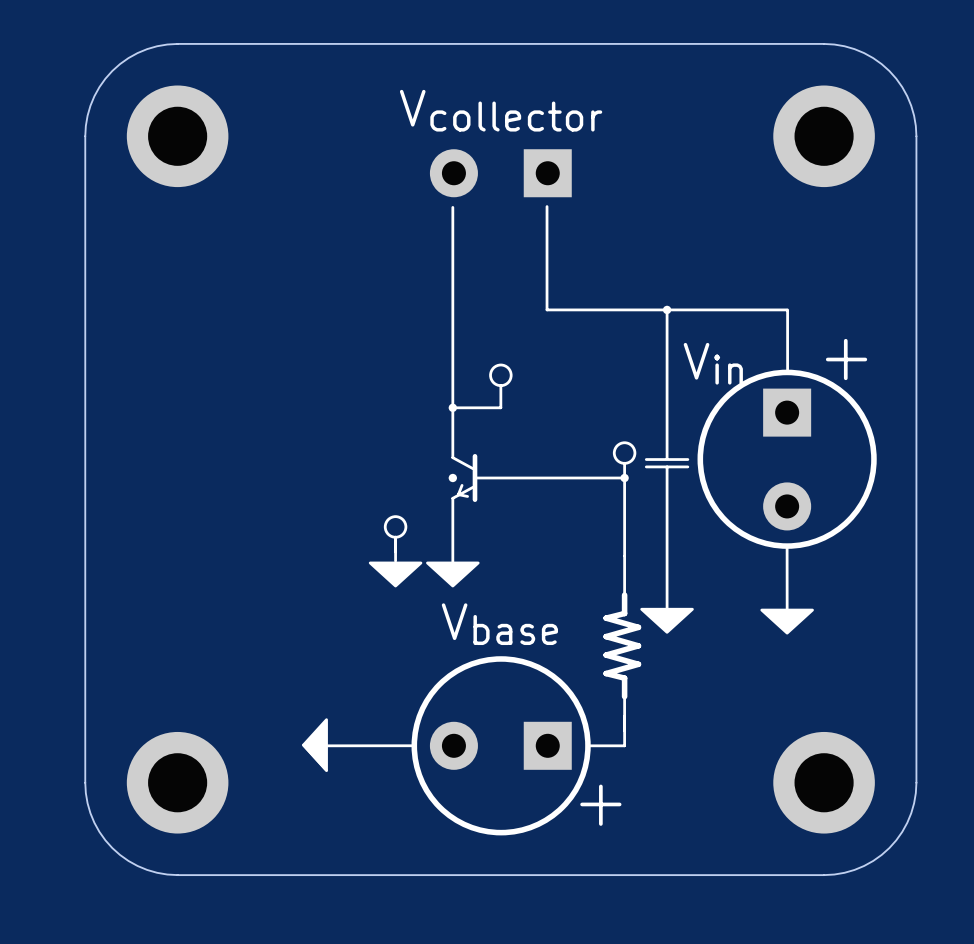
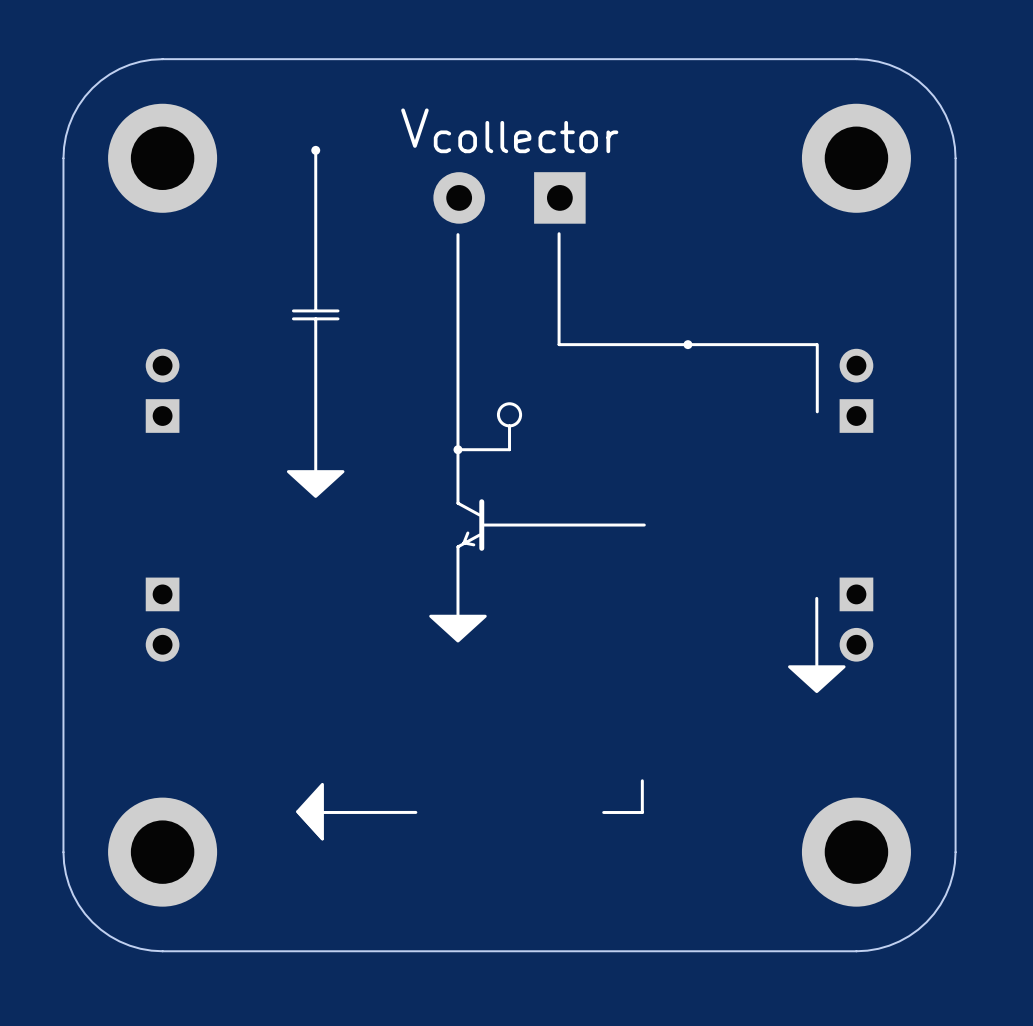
drawing: none -> [311, 145, 321, 155]
line: (667, 309) (667, 458) -> (315, 150) (315, 309)
part: none -> (162, 390)
part: none -> (856, 390)
drawing: [612, 441, 637, 483] -> none
part: (787, 443) -> none
line: (687, 459) (646, 459) -> (338, 310) (293, 310)
line: (624, 463) (624, 555) -> none
line: (667, 466) (667, 621) -> (315, 318) (315, 484)
line: (687, 466) (646, 466) -> (338, 318) (293, 318)
drawing: [448, 473, 457, 483] -> none
drawing: [383, 515, 408, 539] -> none
line: (395, 537) (395, 561) -> none
drawing: [603, 554, 694, 733] -> none
part: none -> (162, 619)
part: none -> (856, 619)
drawing position: (395, 574) -> (315, 484)
part: (516, 745) -> none

